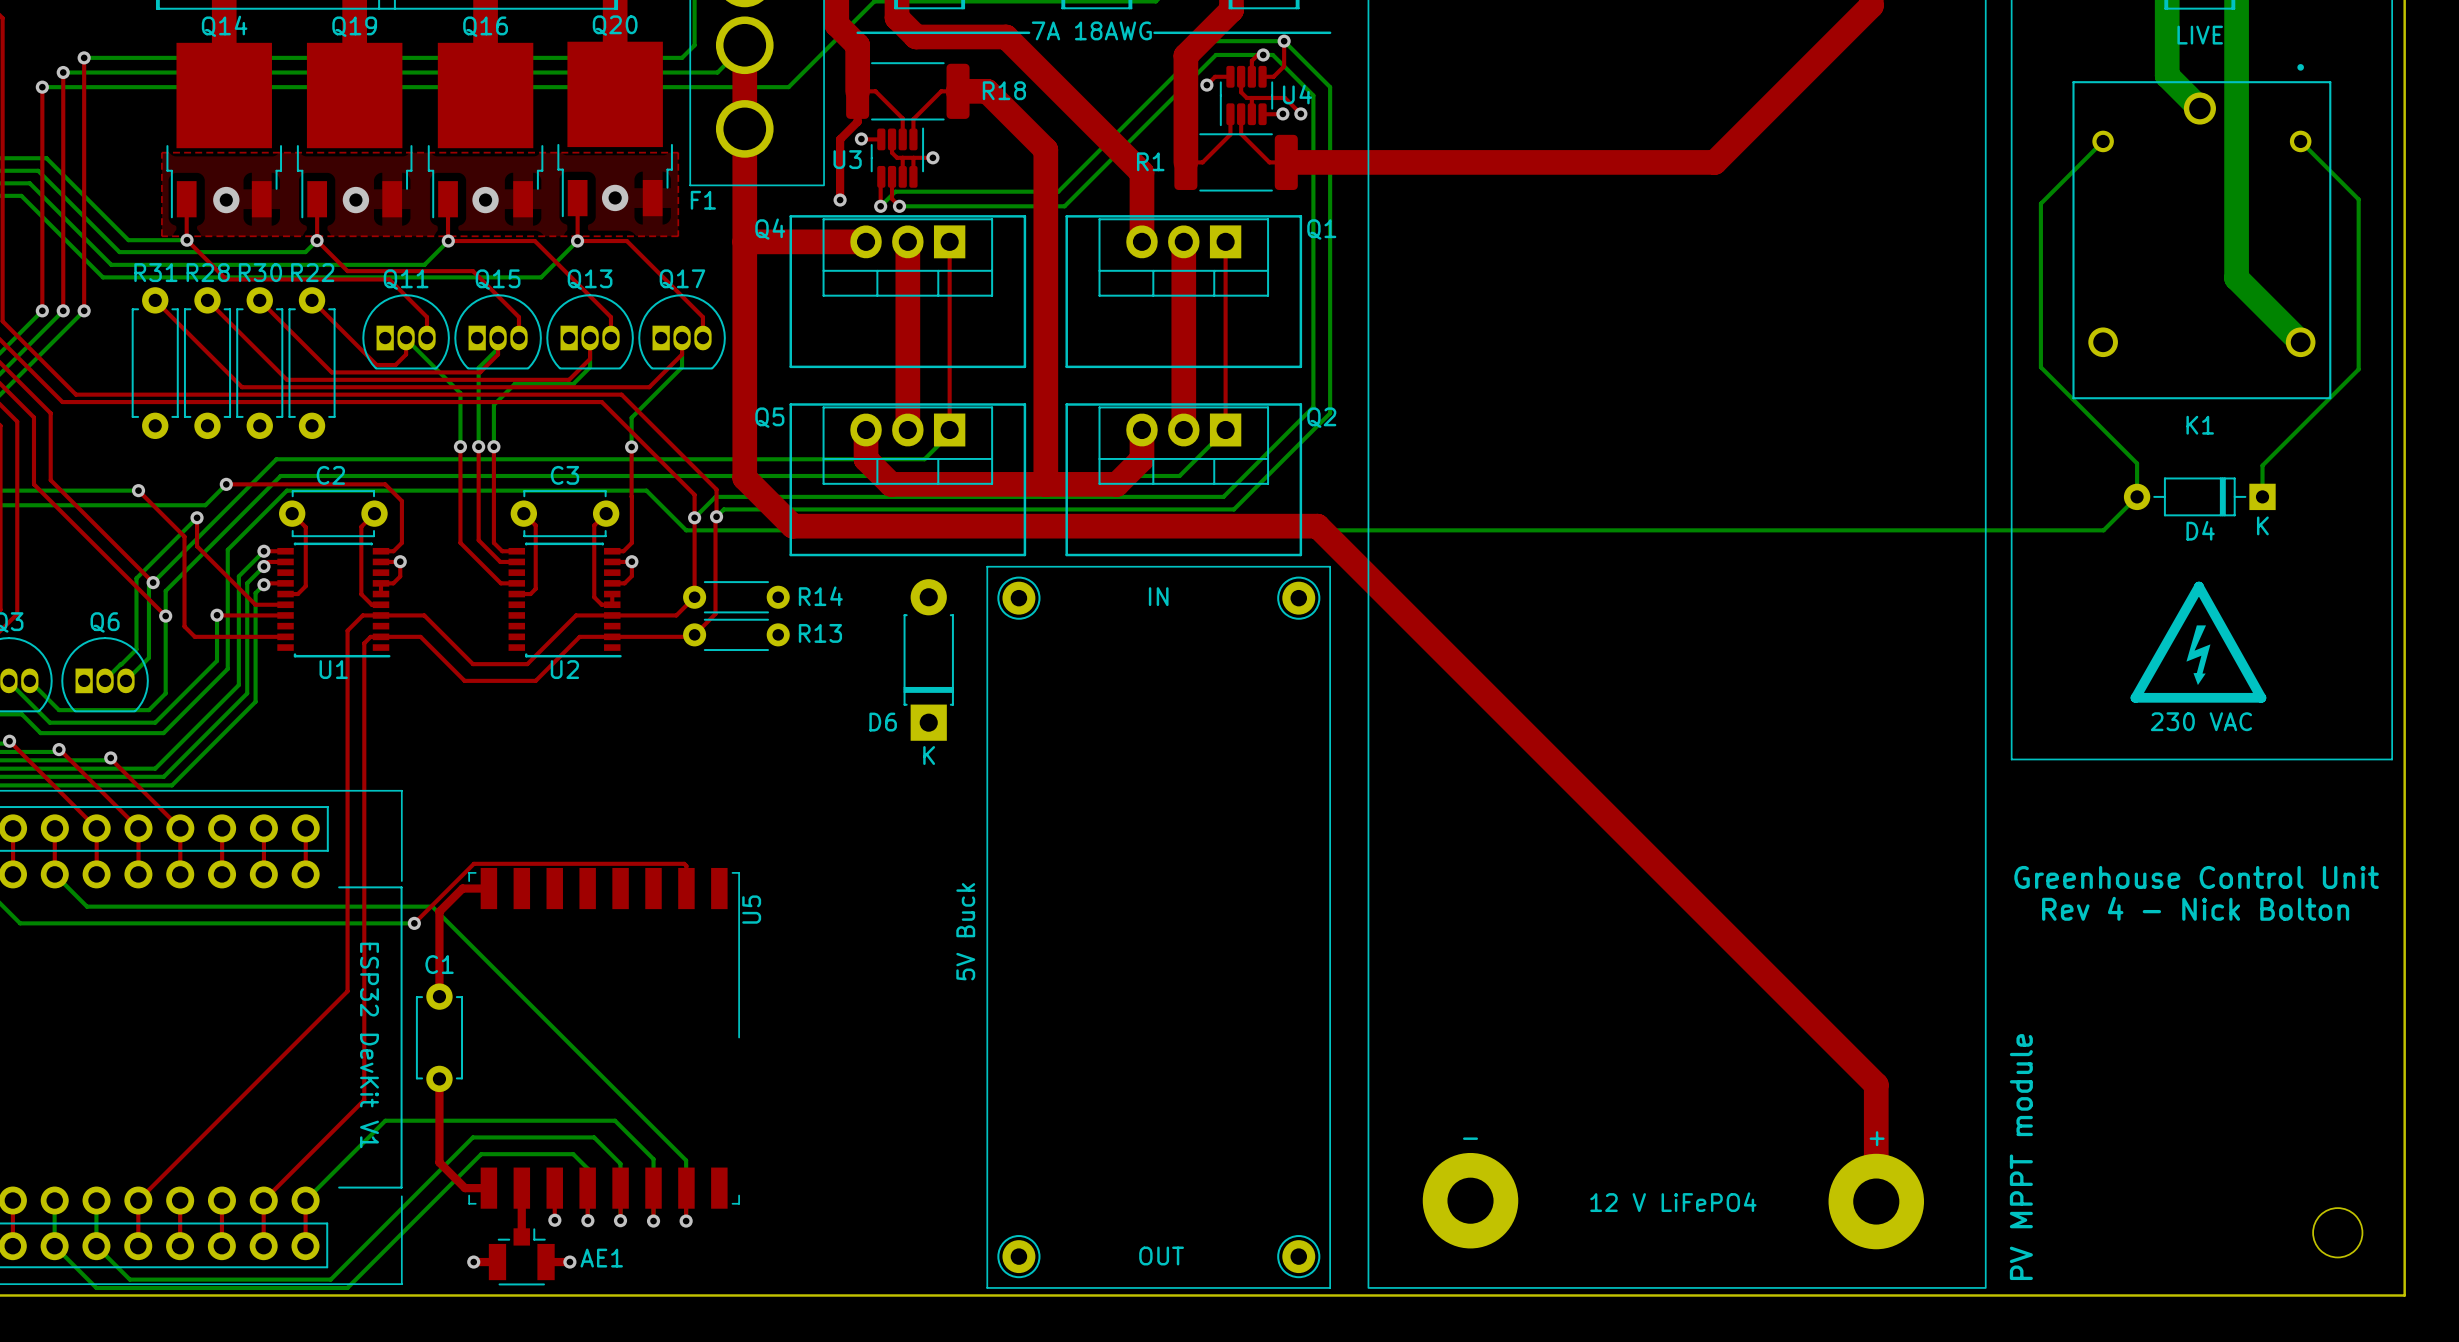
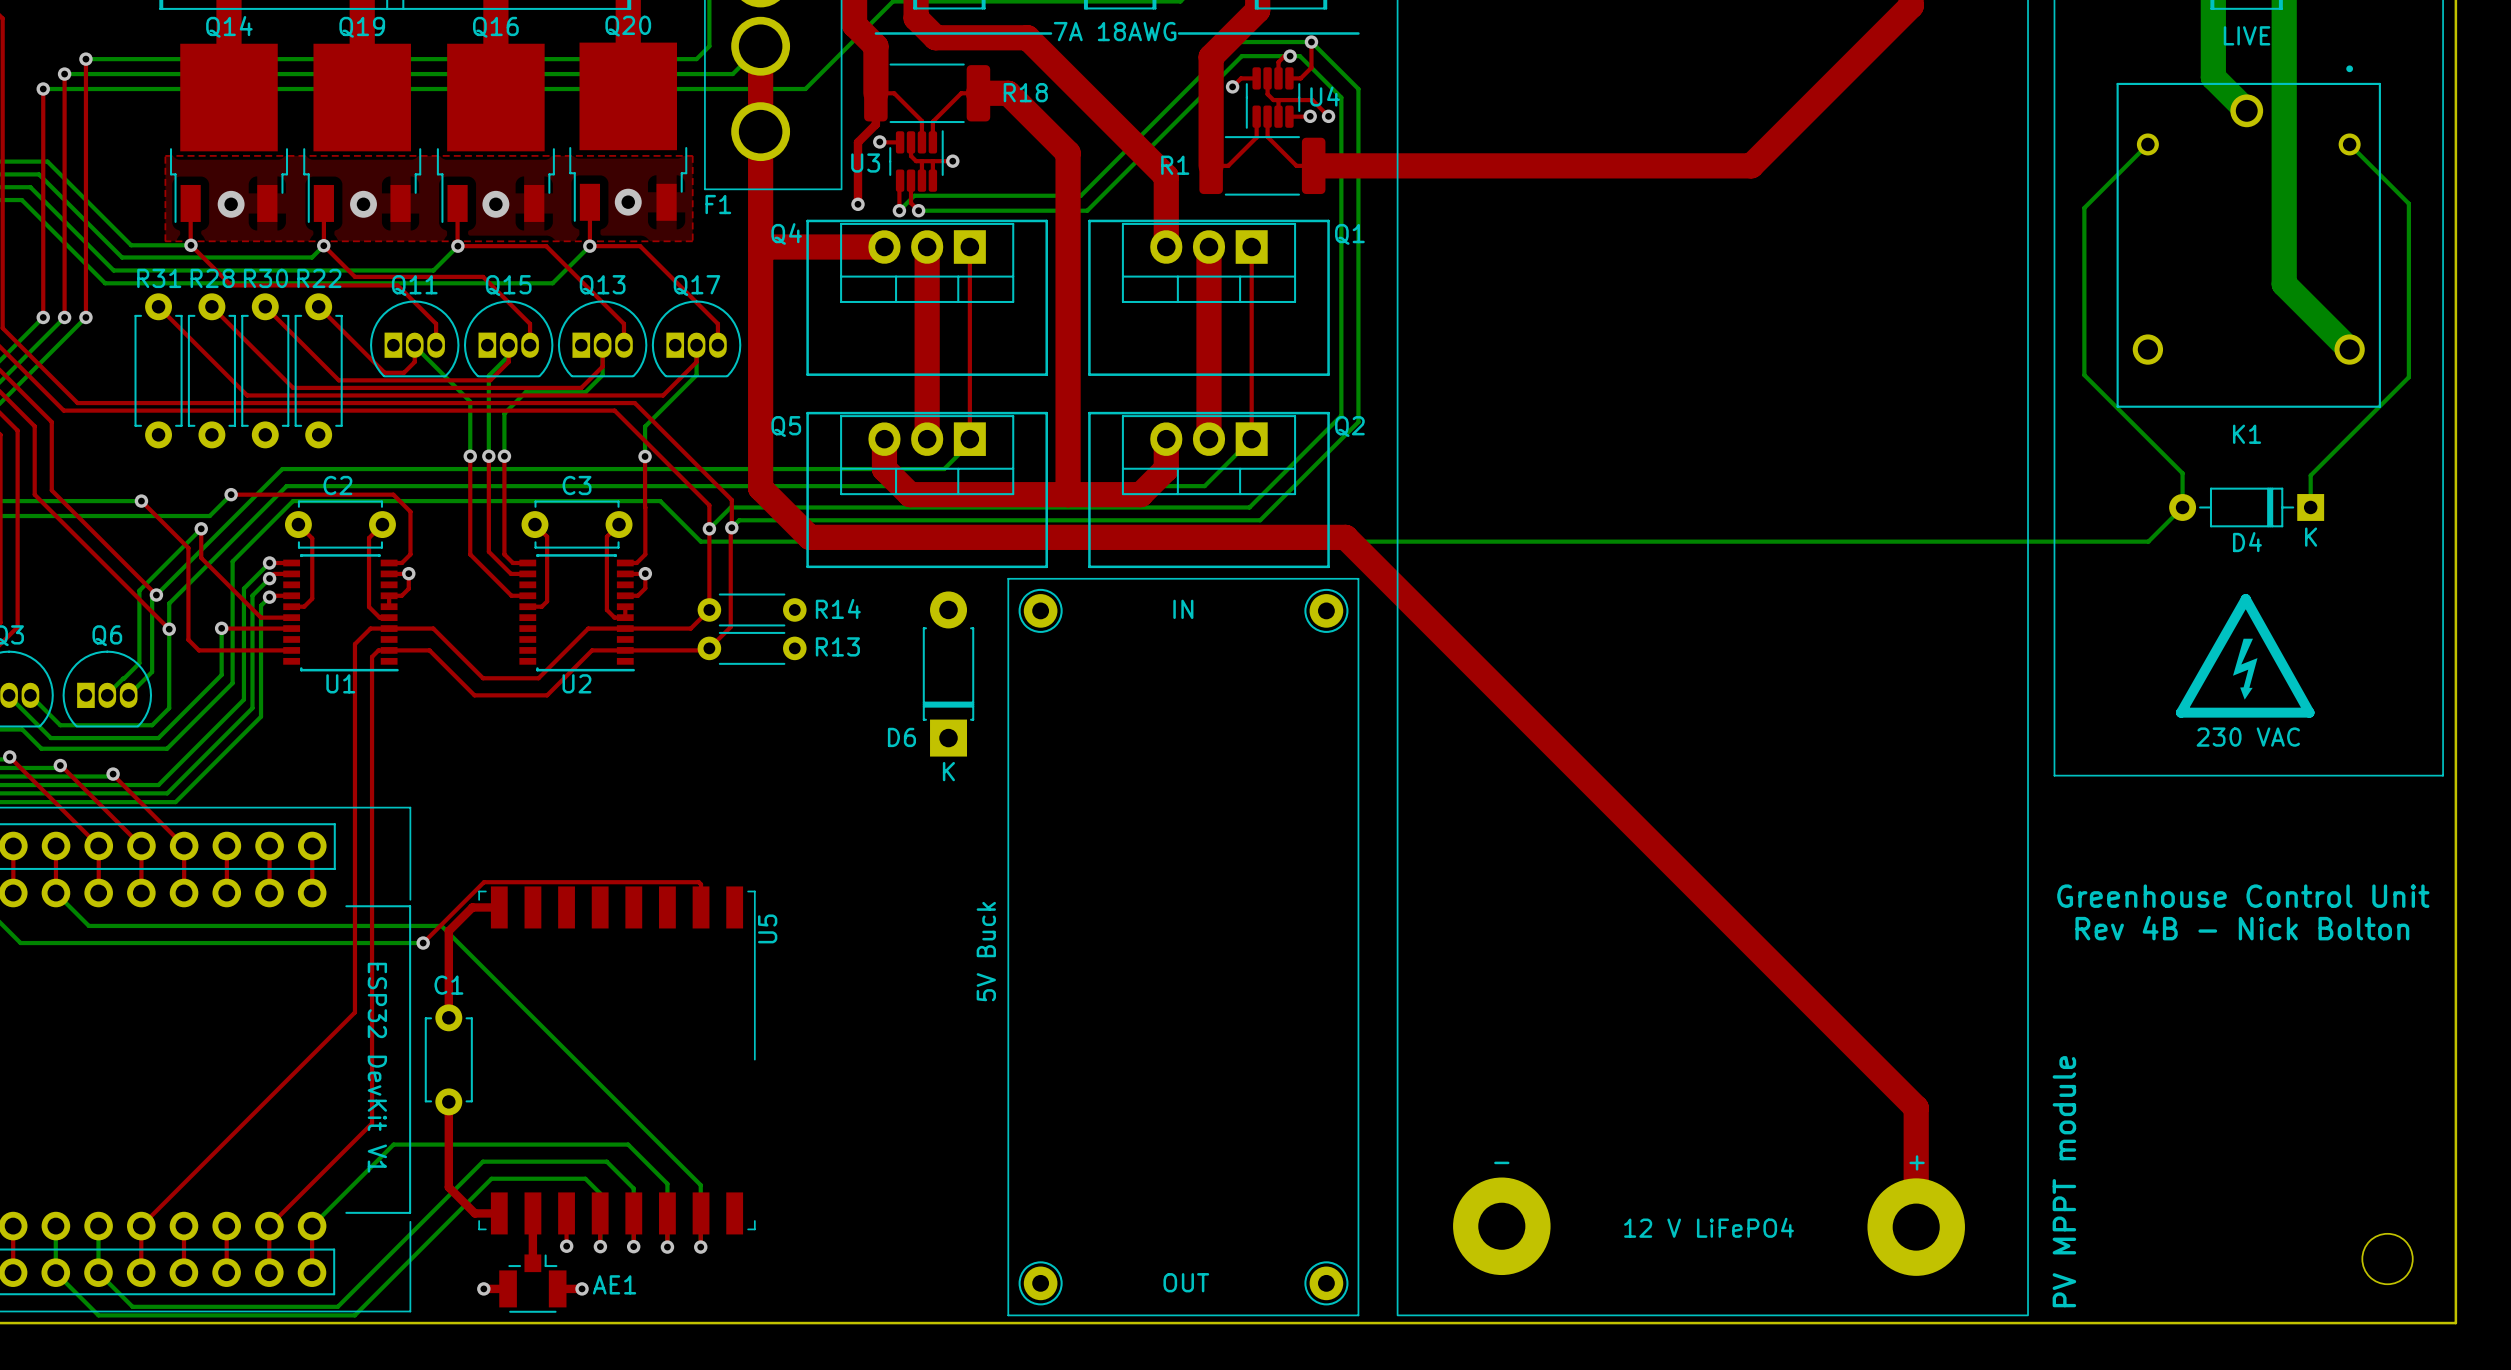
text: Rev 4 - Nick Bolton (2195, 908) -> Rev 4B - Nick Bolton (2242, 928)

